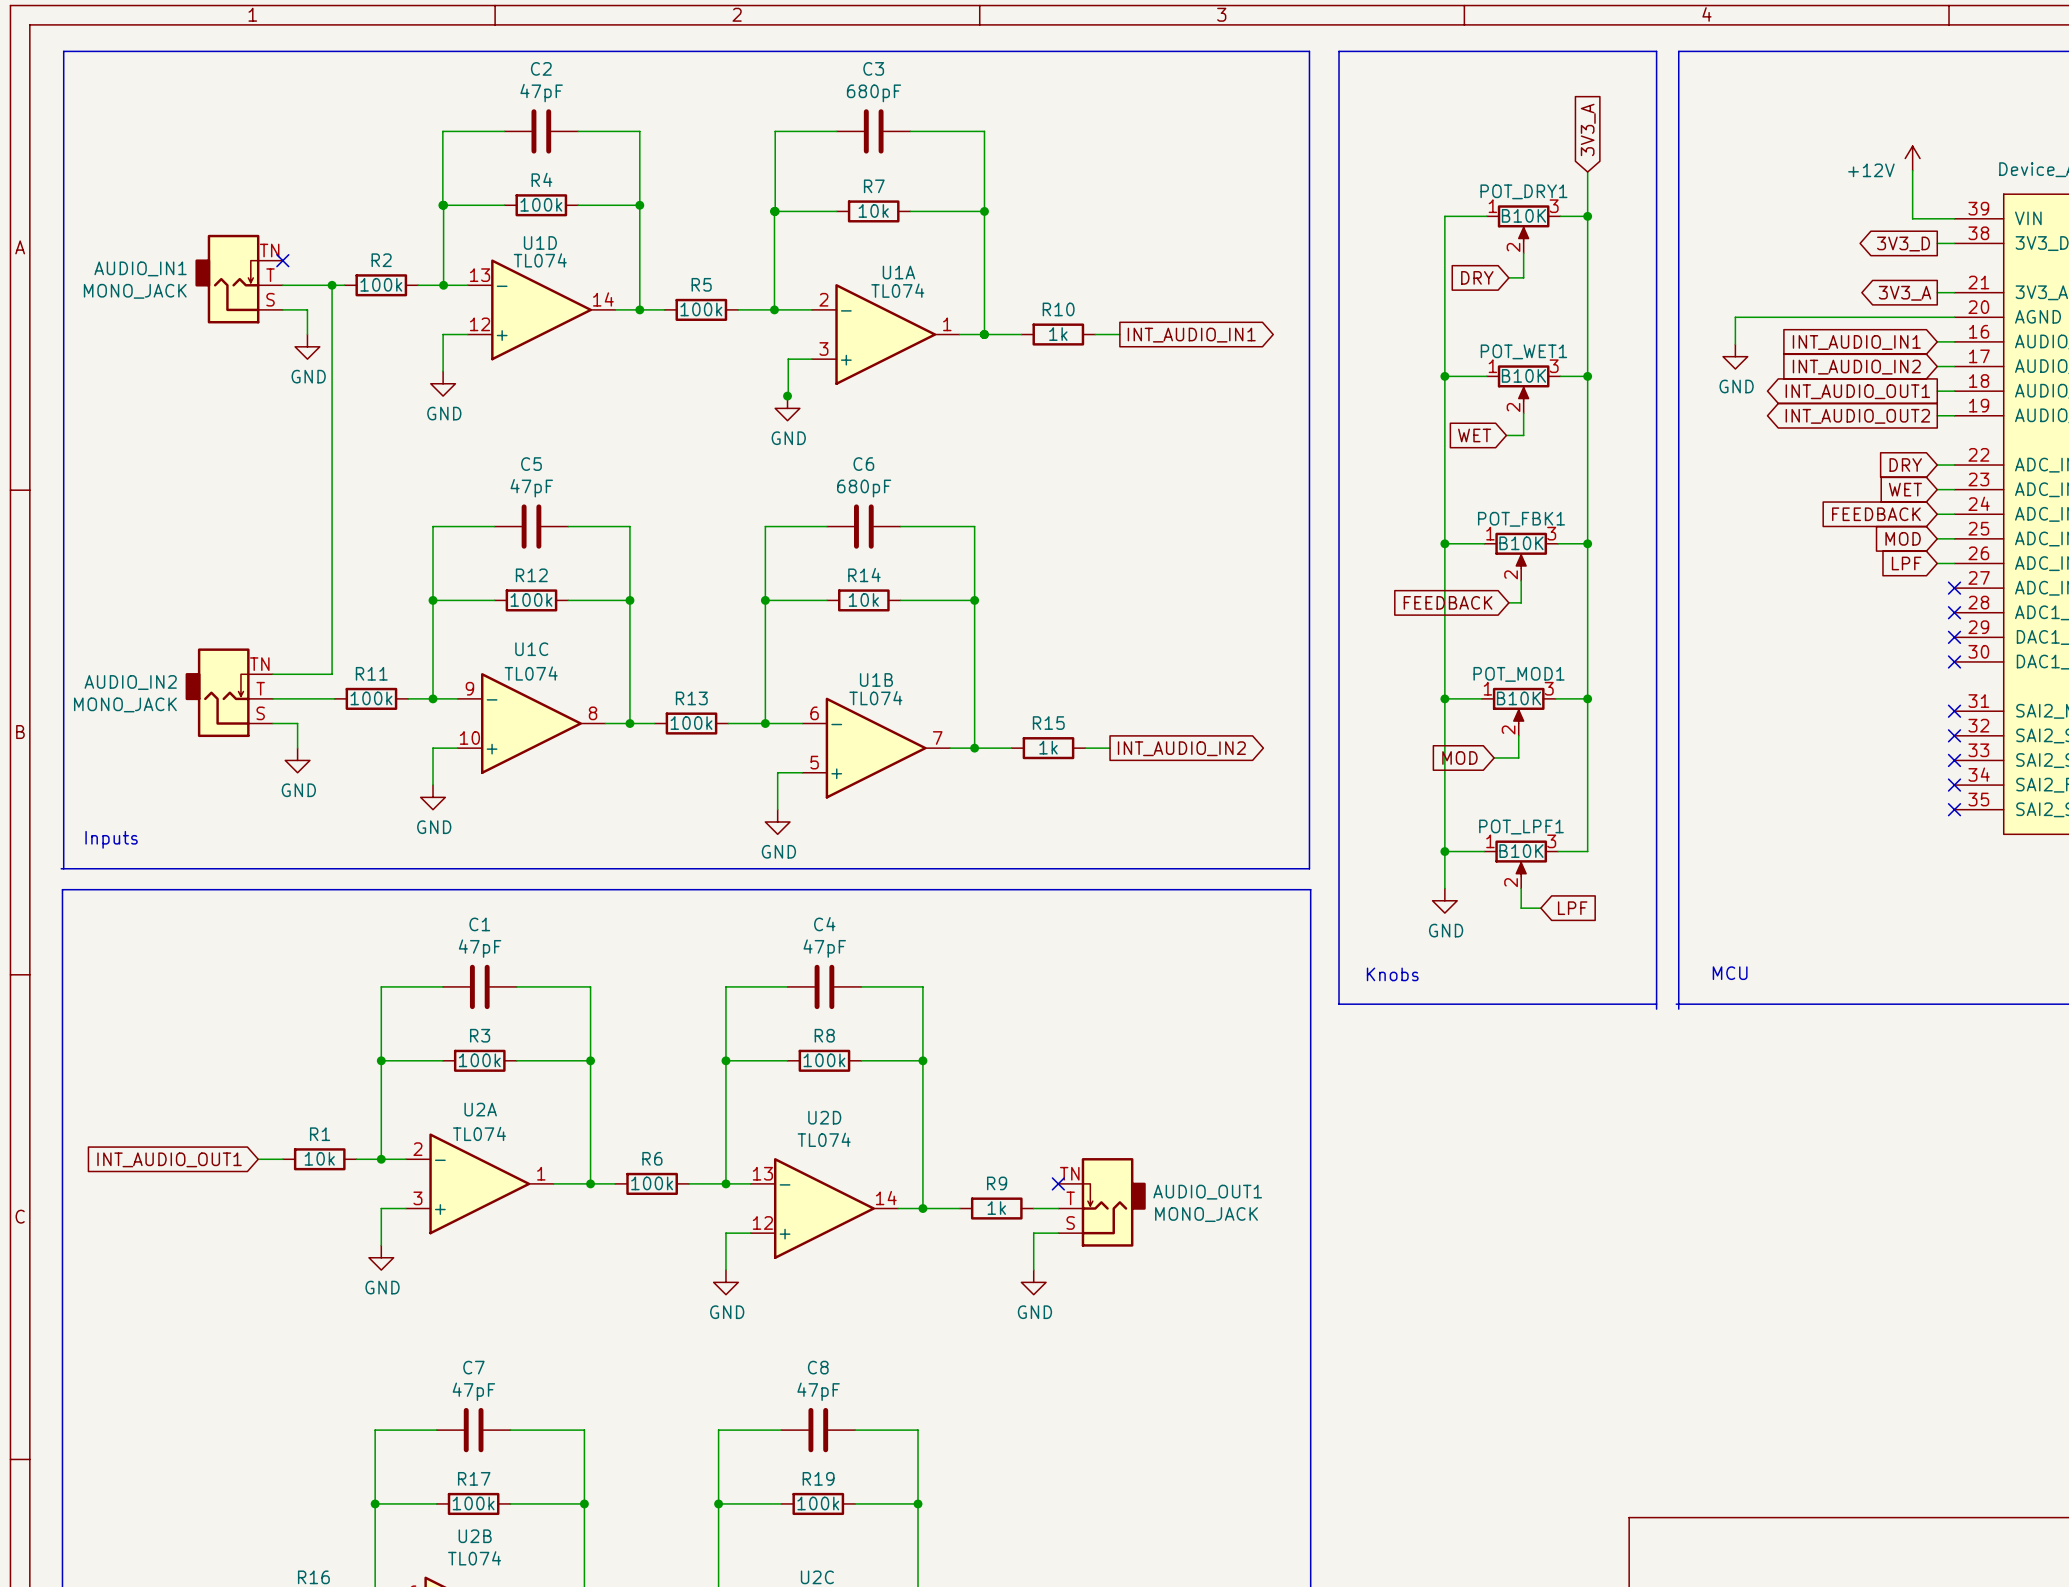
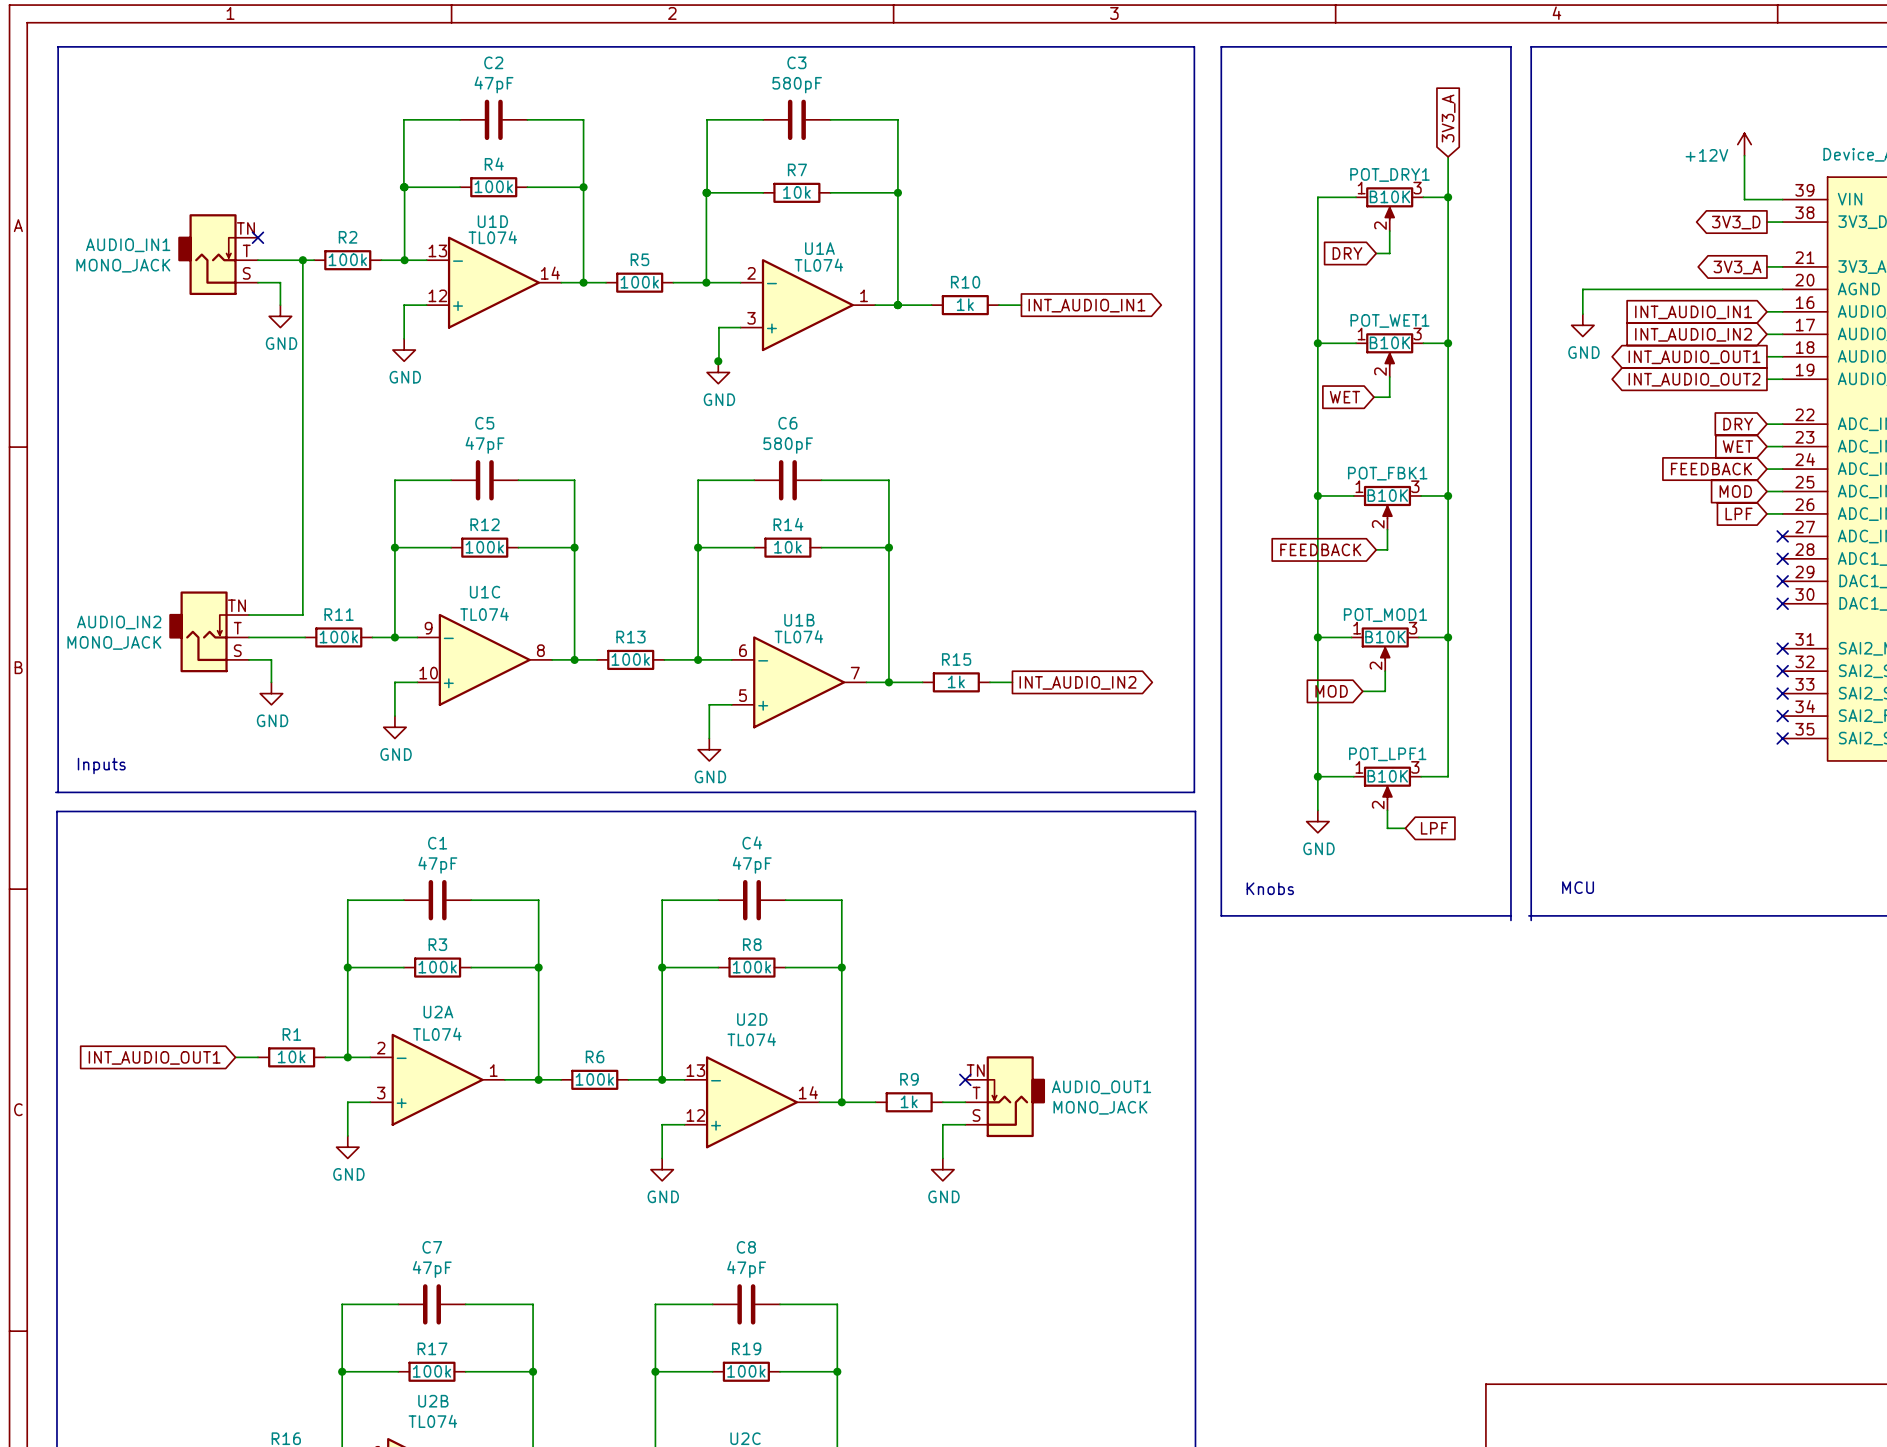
C3 value: 680pF (873, 93) -> 580pF (797, 85)
C6 value: 680pF (864, 488) -> 580pF (788, 445)

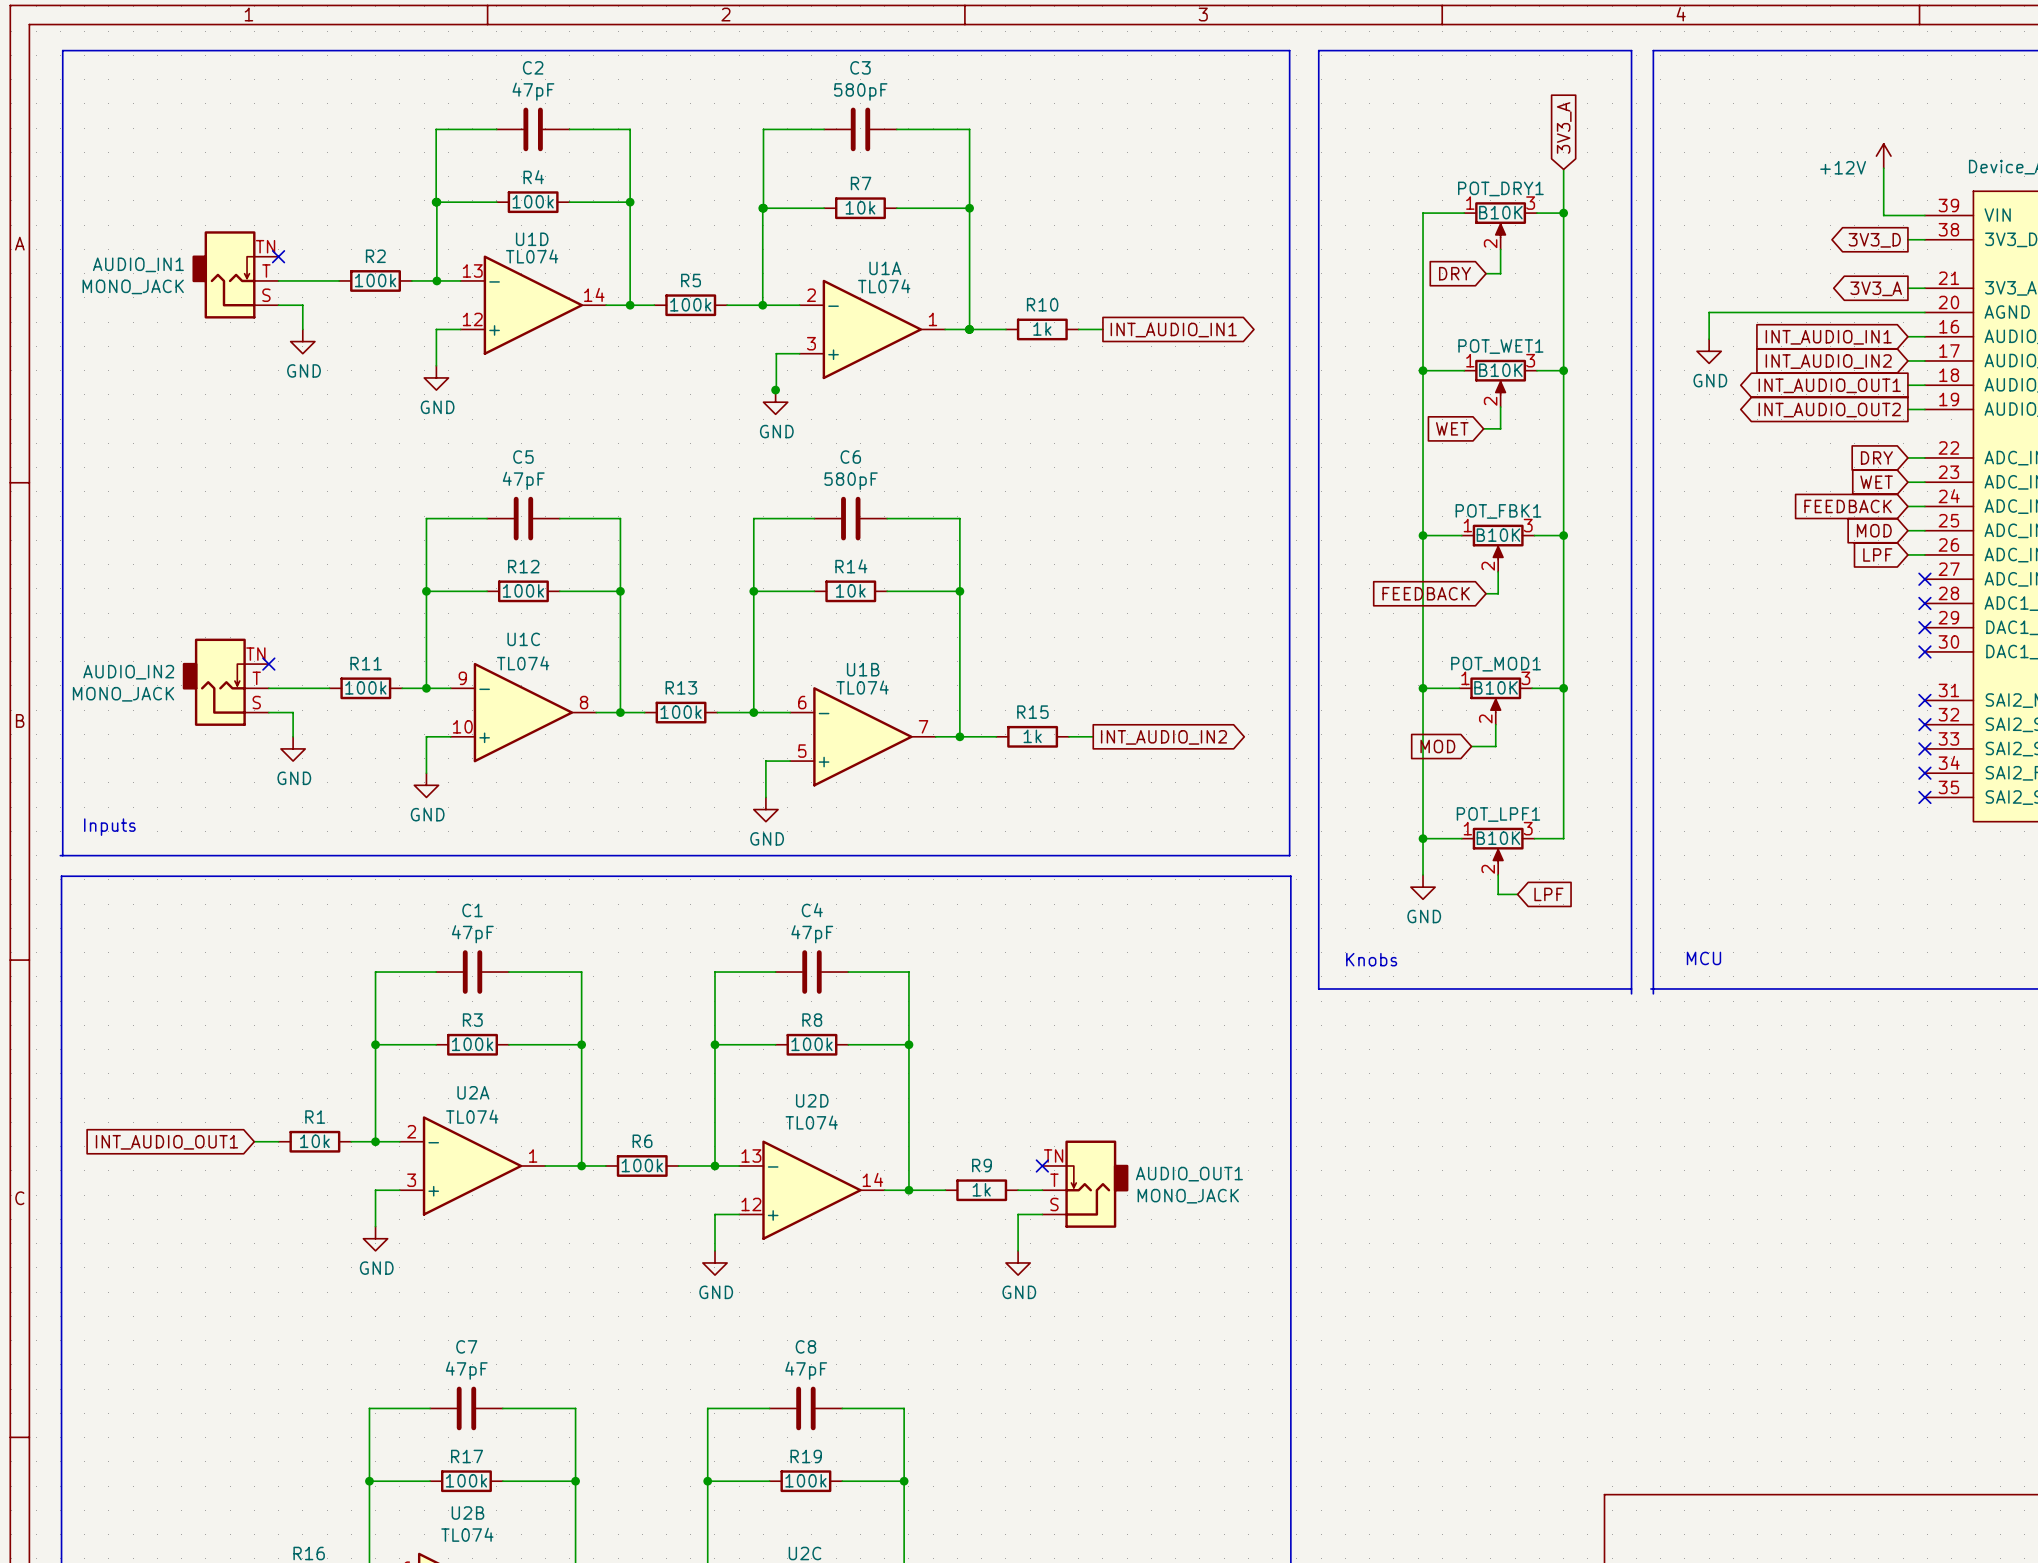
wire: (302, 260) (302, 615) (248, 615) -> none
junction: (302, 260) -> none
no-connect mark: none -> (268, 664)

